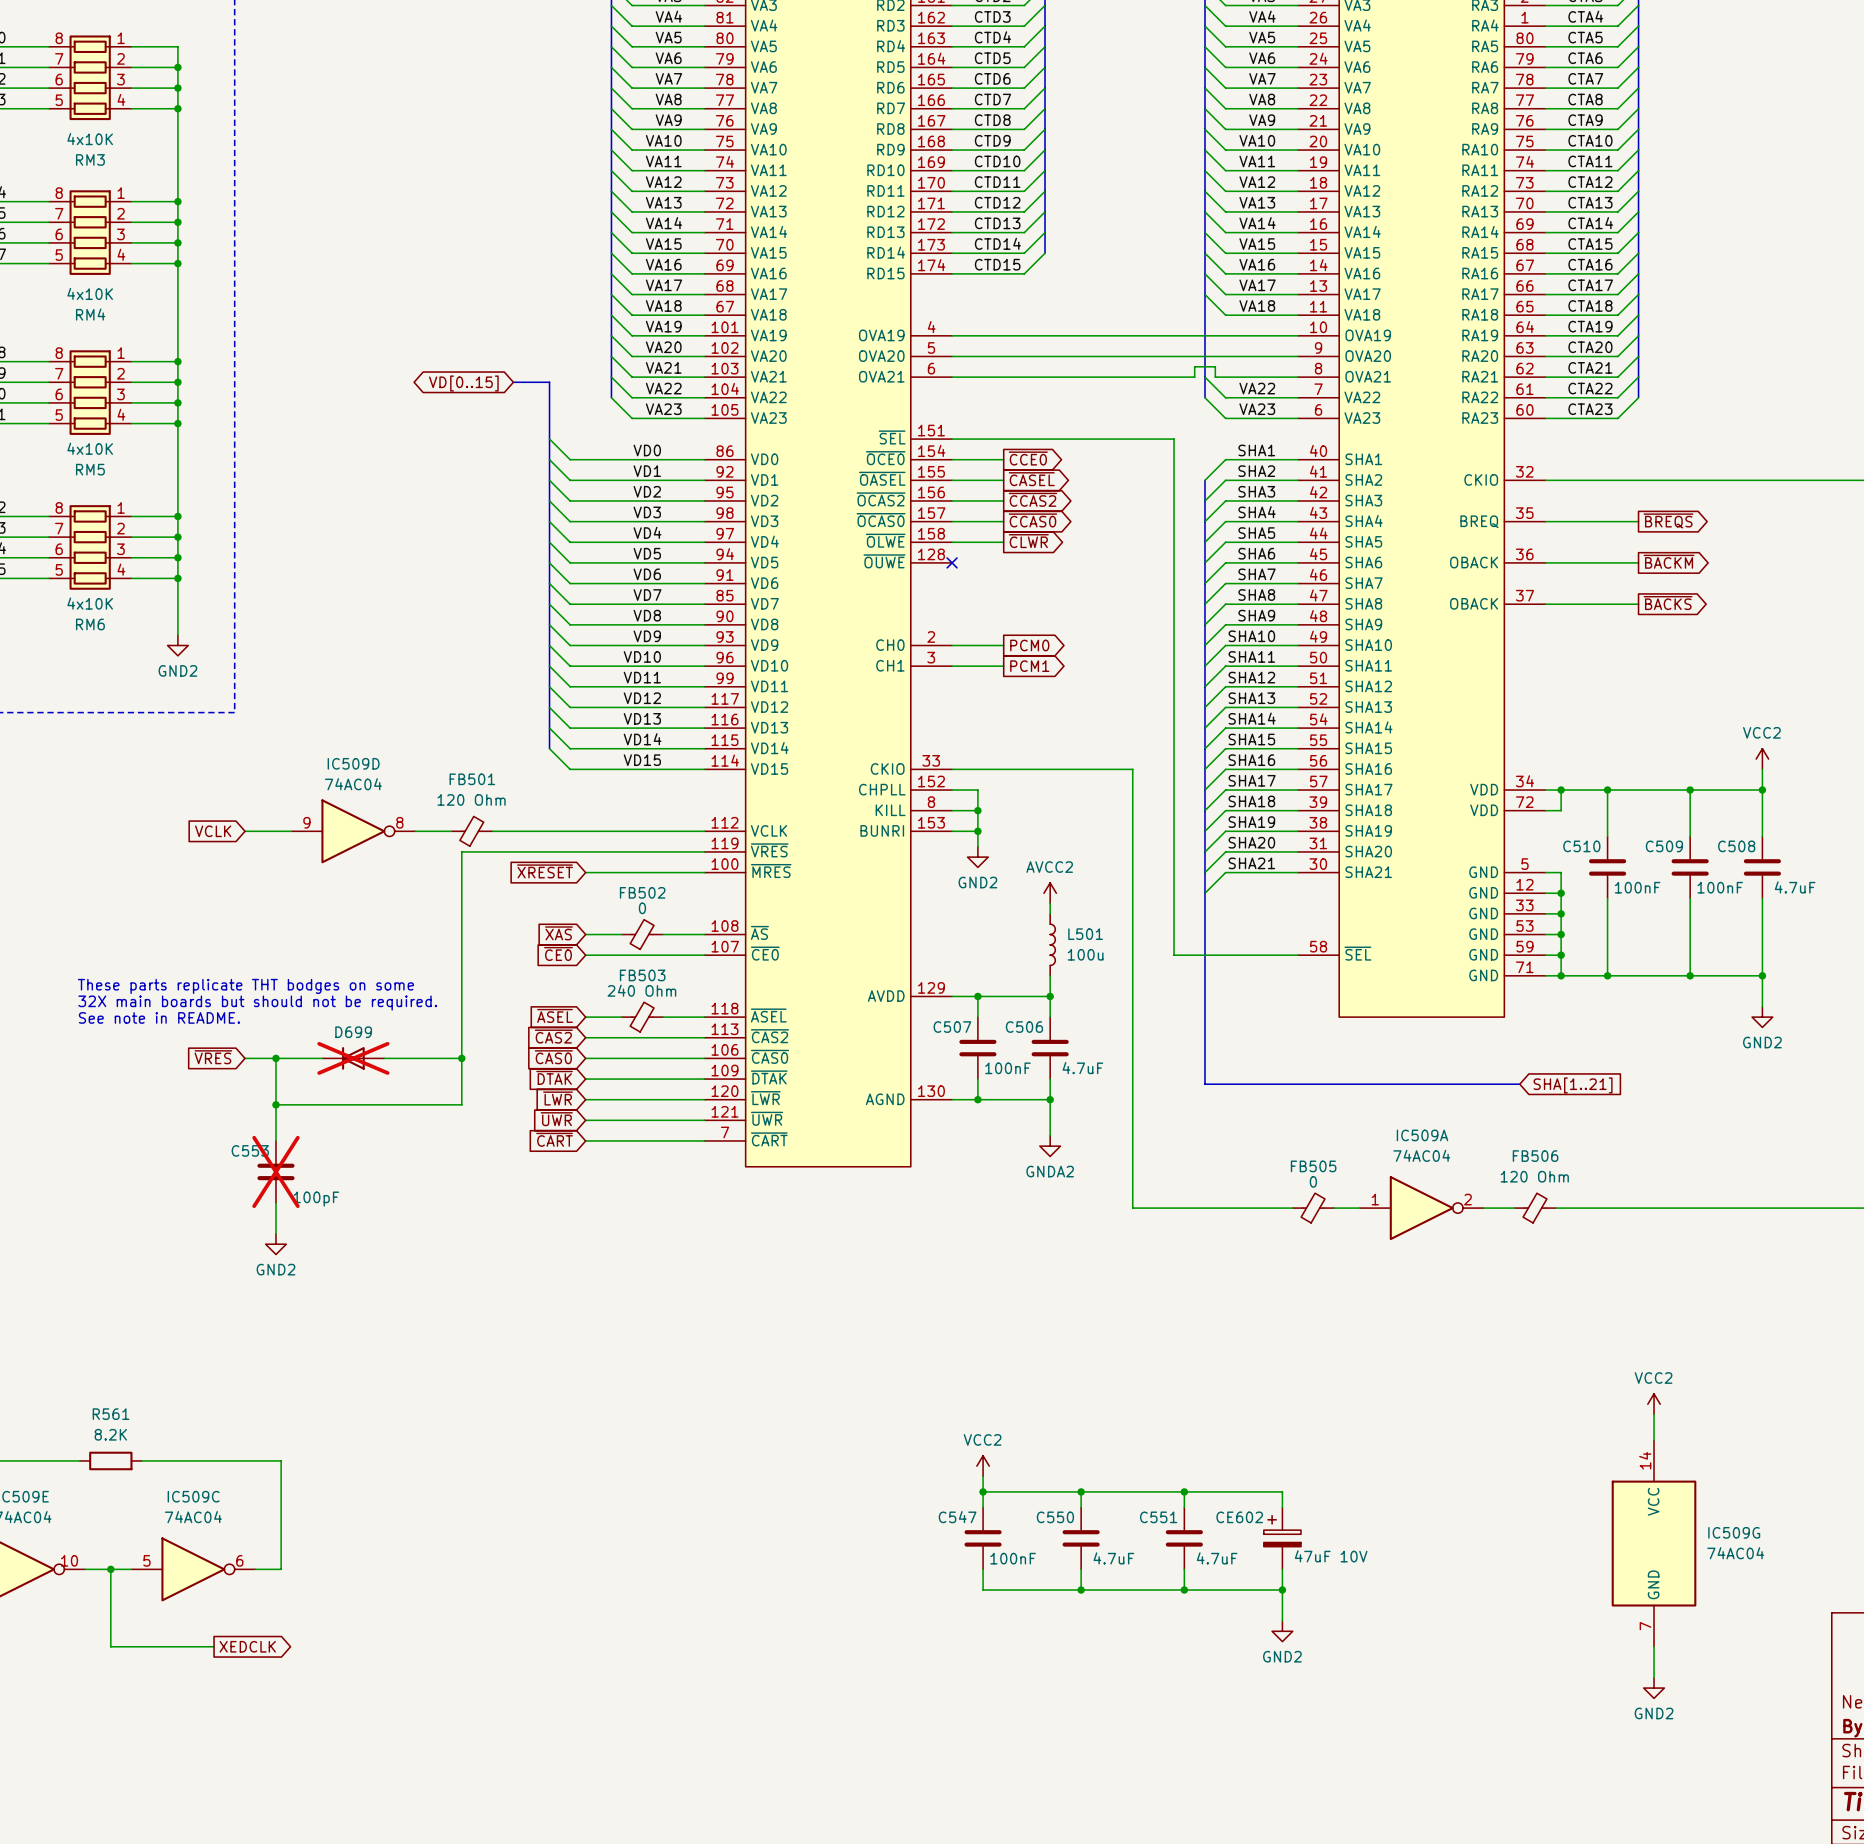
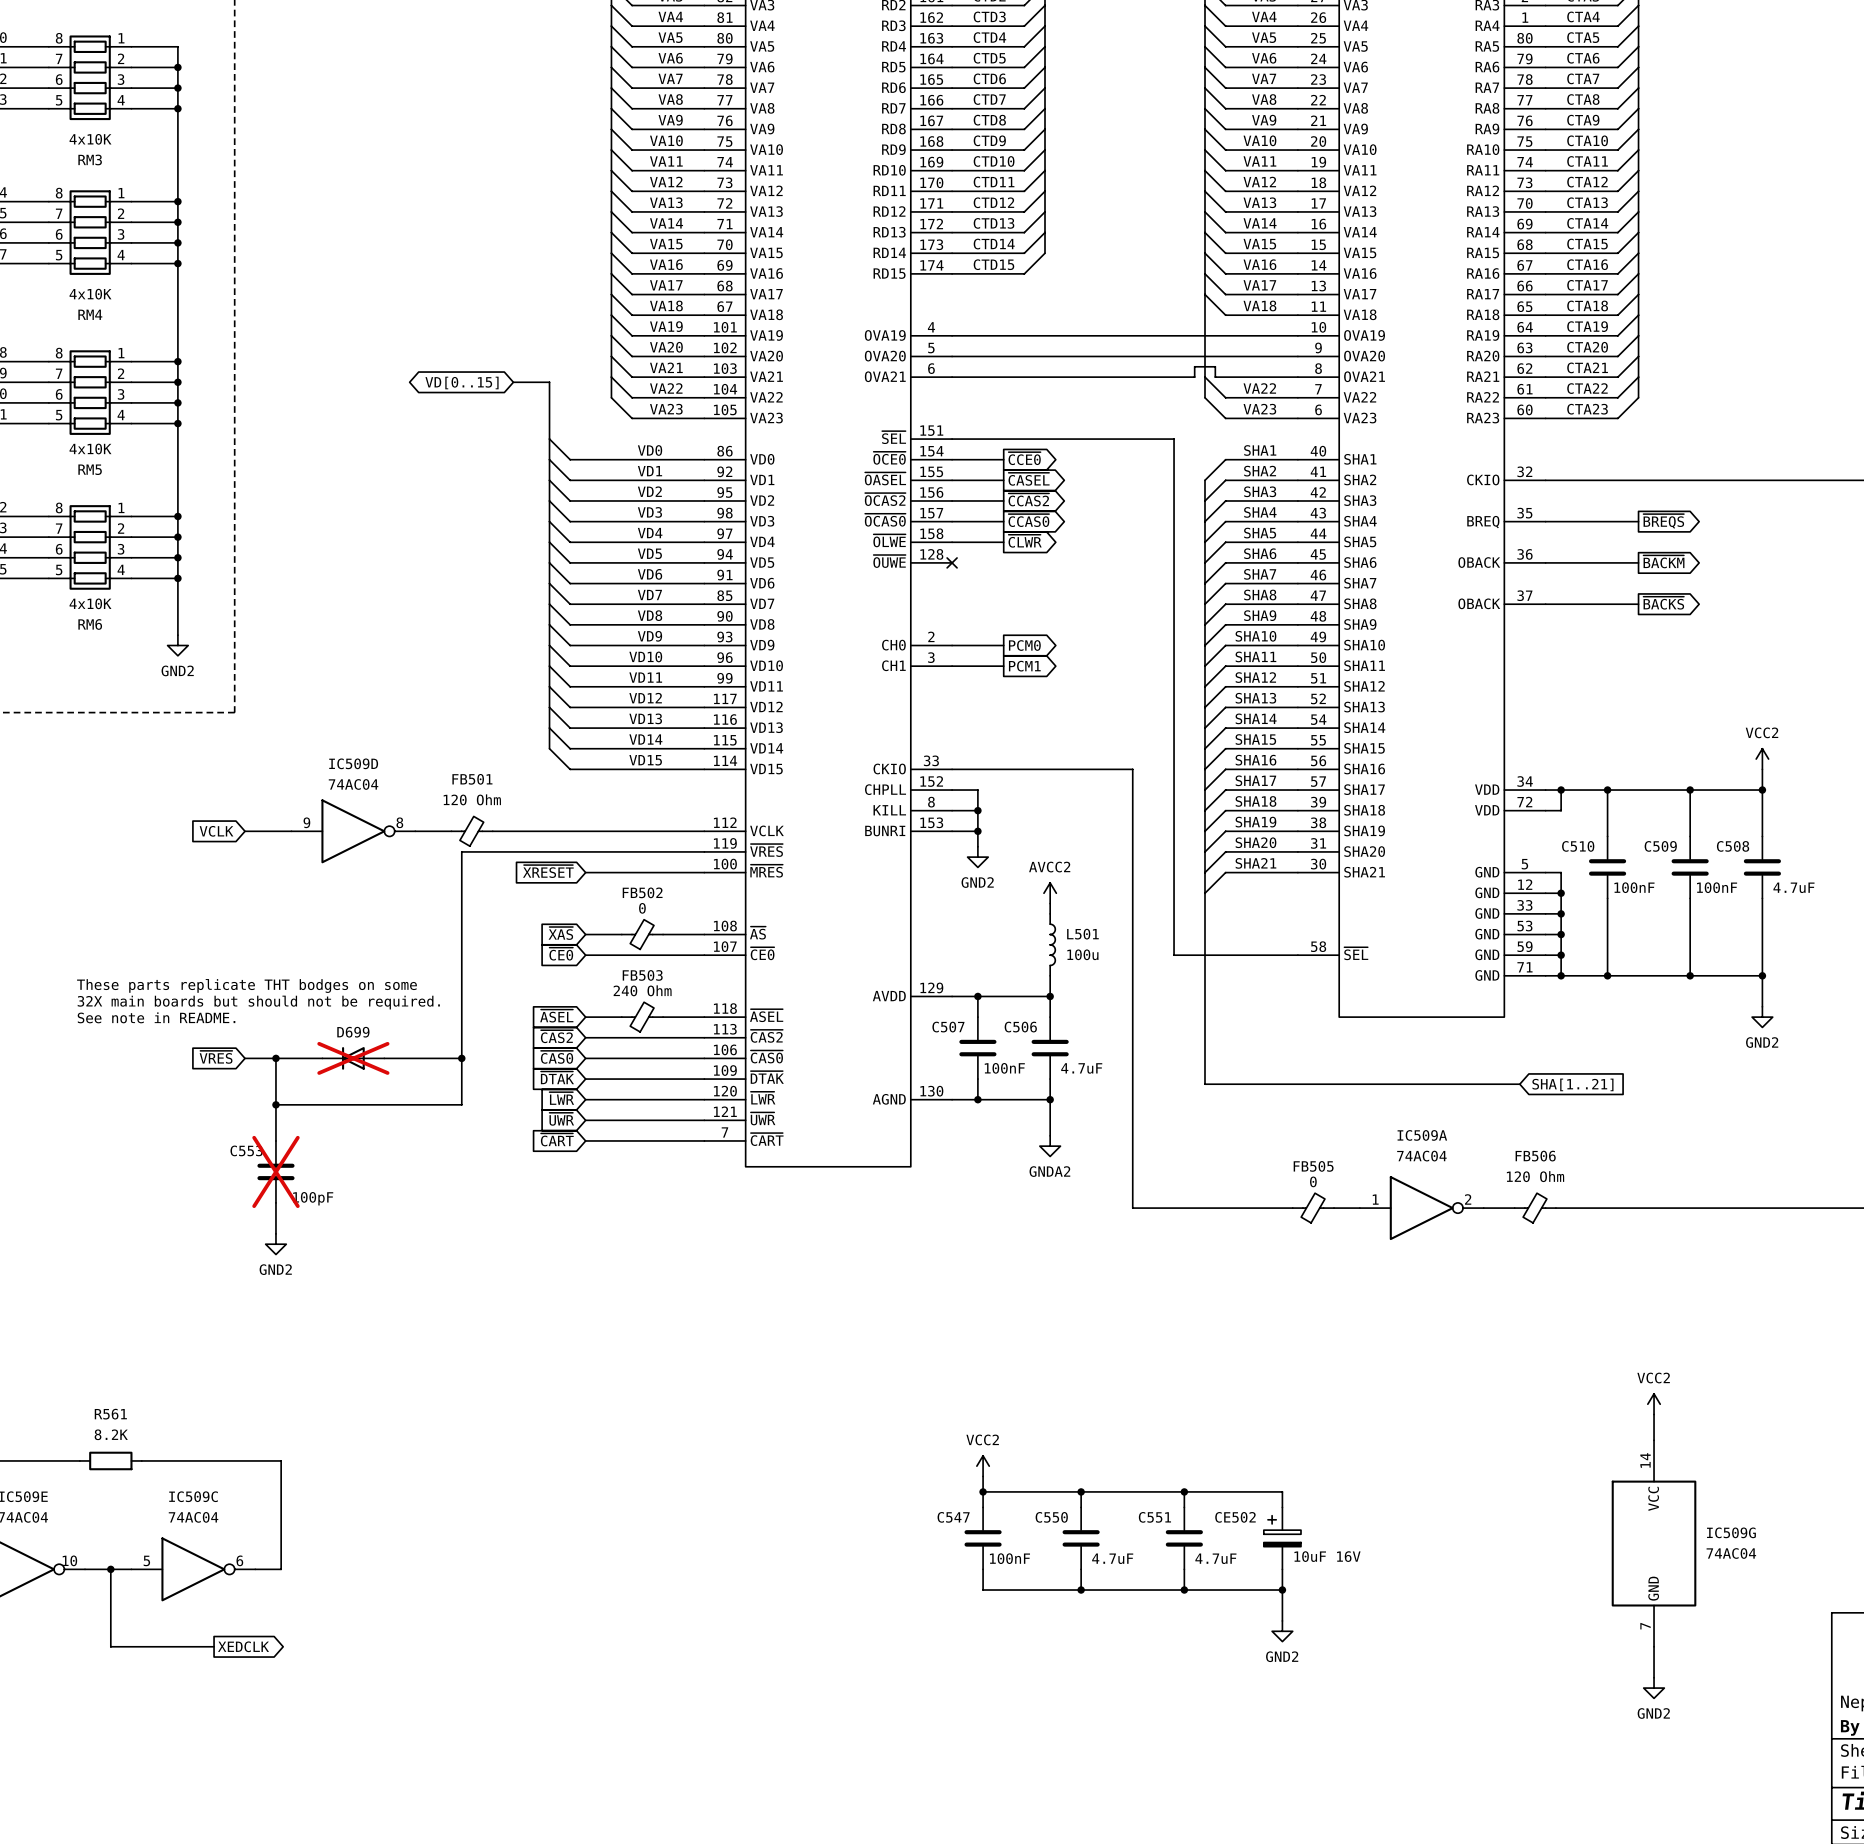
CE602 name: CE602 (1239, 1517) -> CE502 (1235, 1517)
CE602 value: 47uF 10V (1331, 1556) -> 10uF 16V (1327, 1556)

